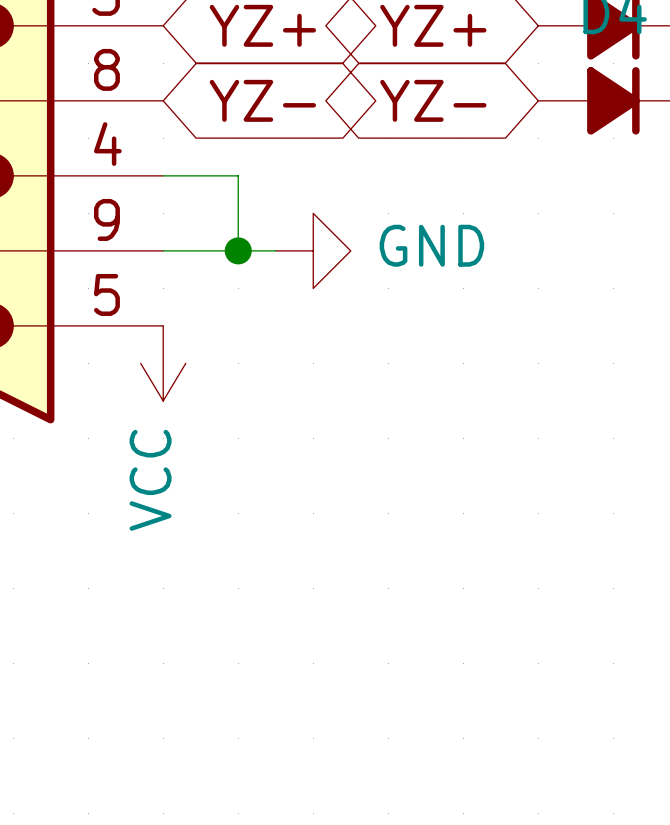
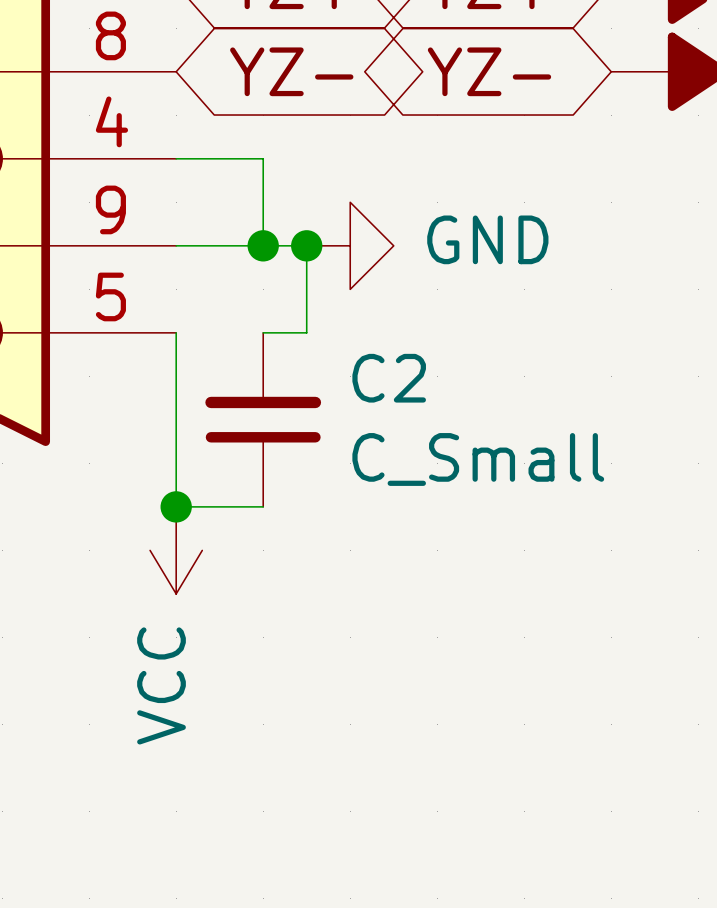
wire: none -> (306, 245) (306, 332) (263, 332)
junction: none -> (306, 245)
wire: none -> (176, 332) (176, 506) (263, 506)
power symbol position: VCC (163, 363) -> VCC (176, 550)
C2: none -> C_Small (263, 419)
junction: none -> (176, 506)

